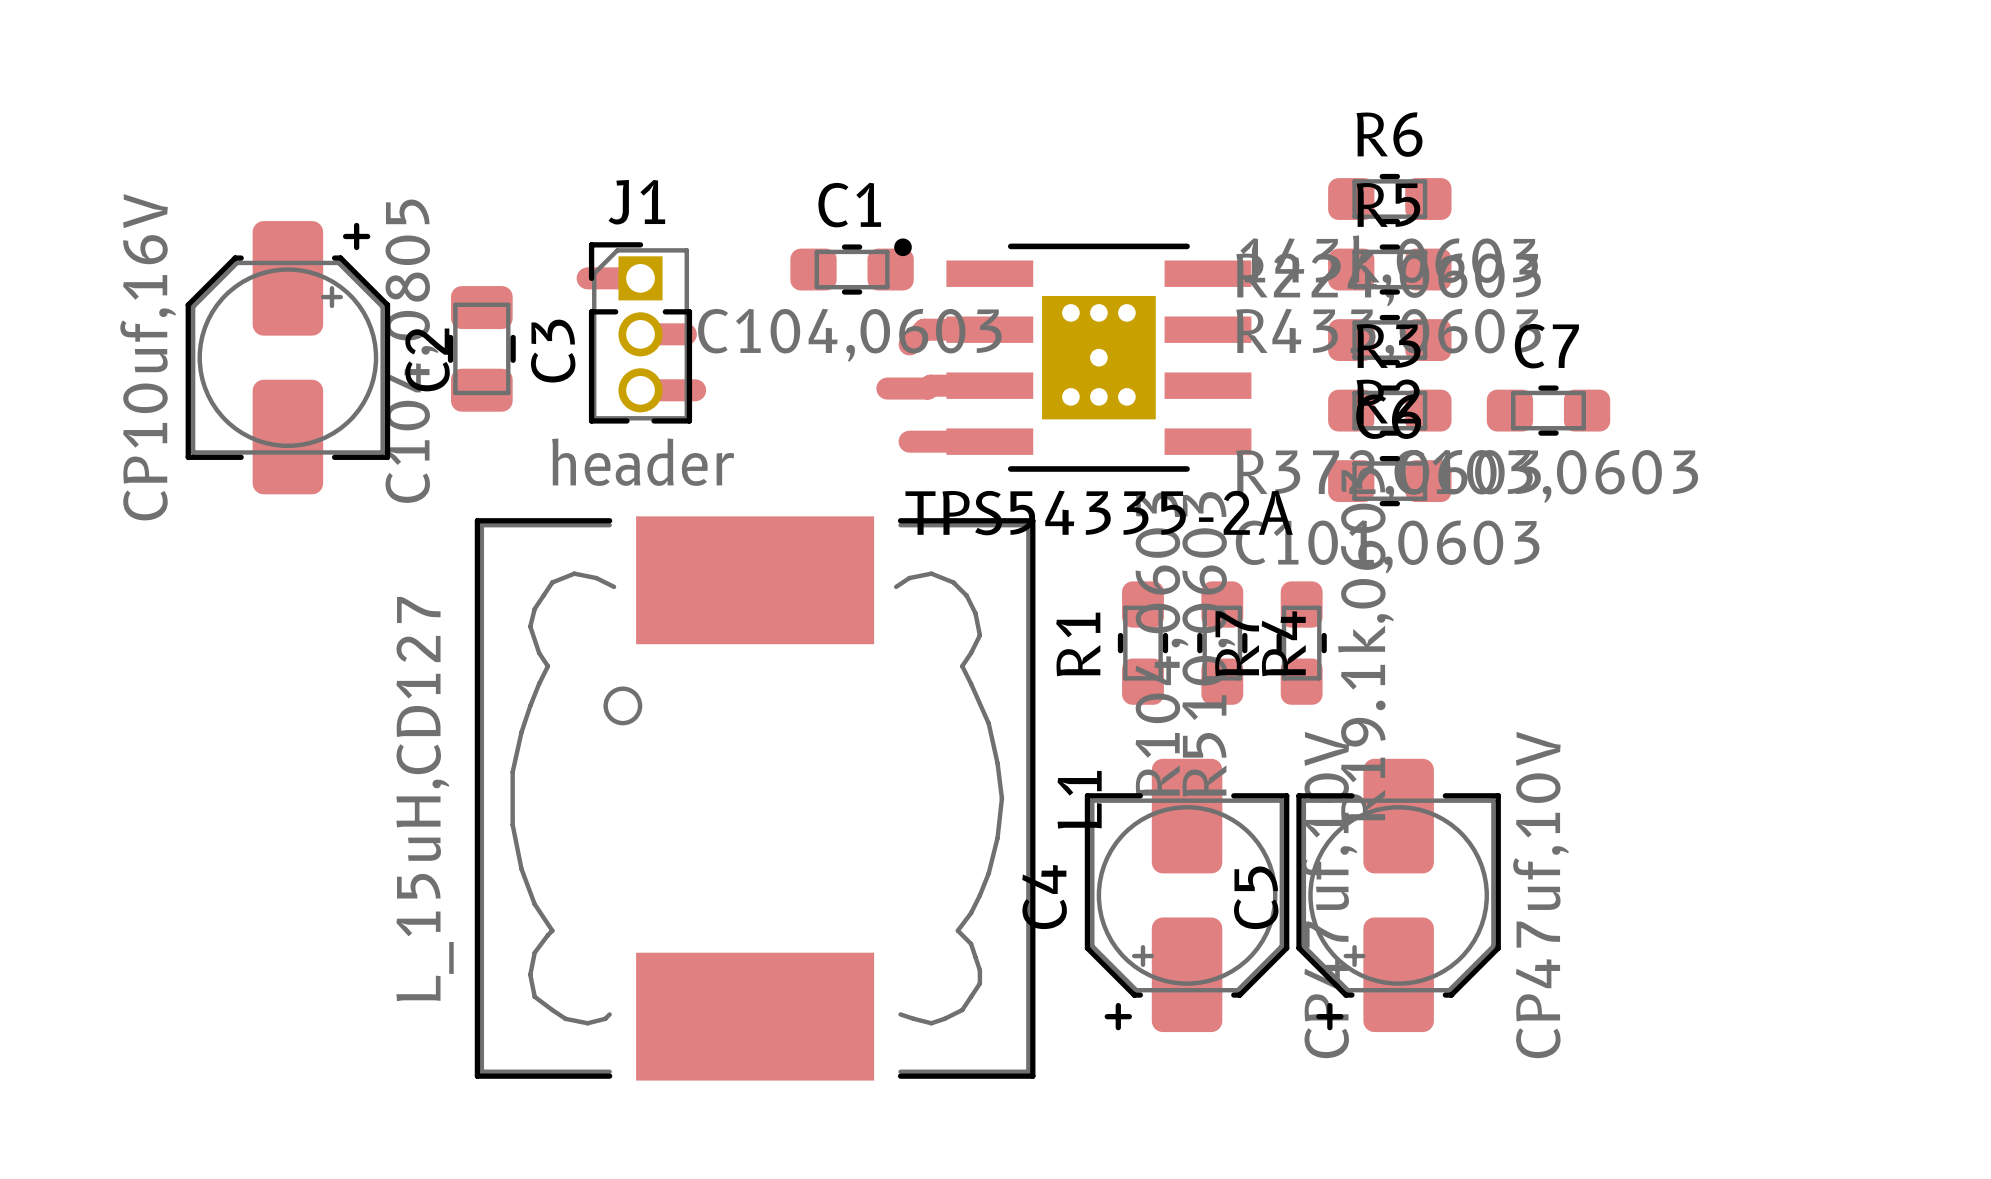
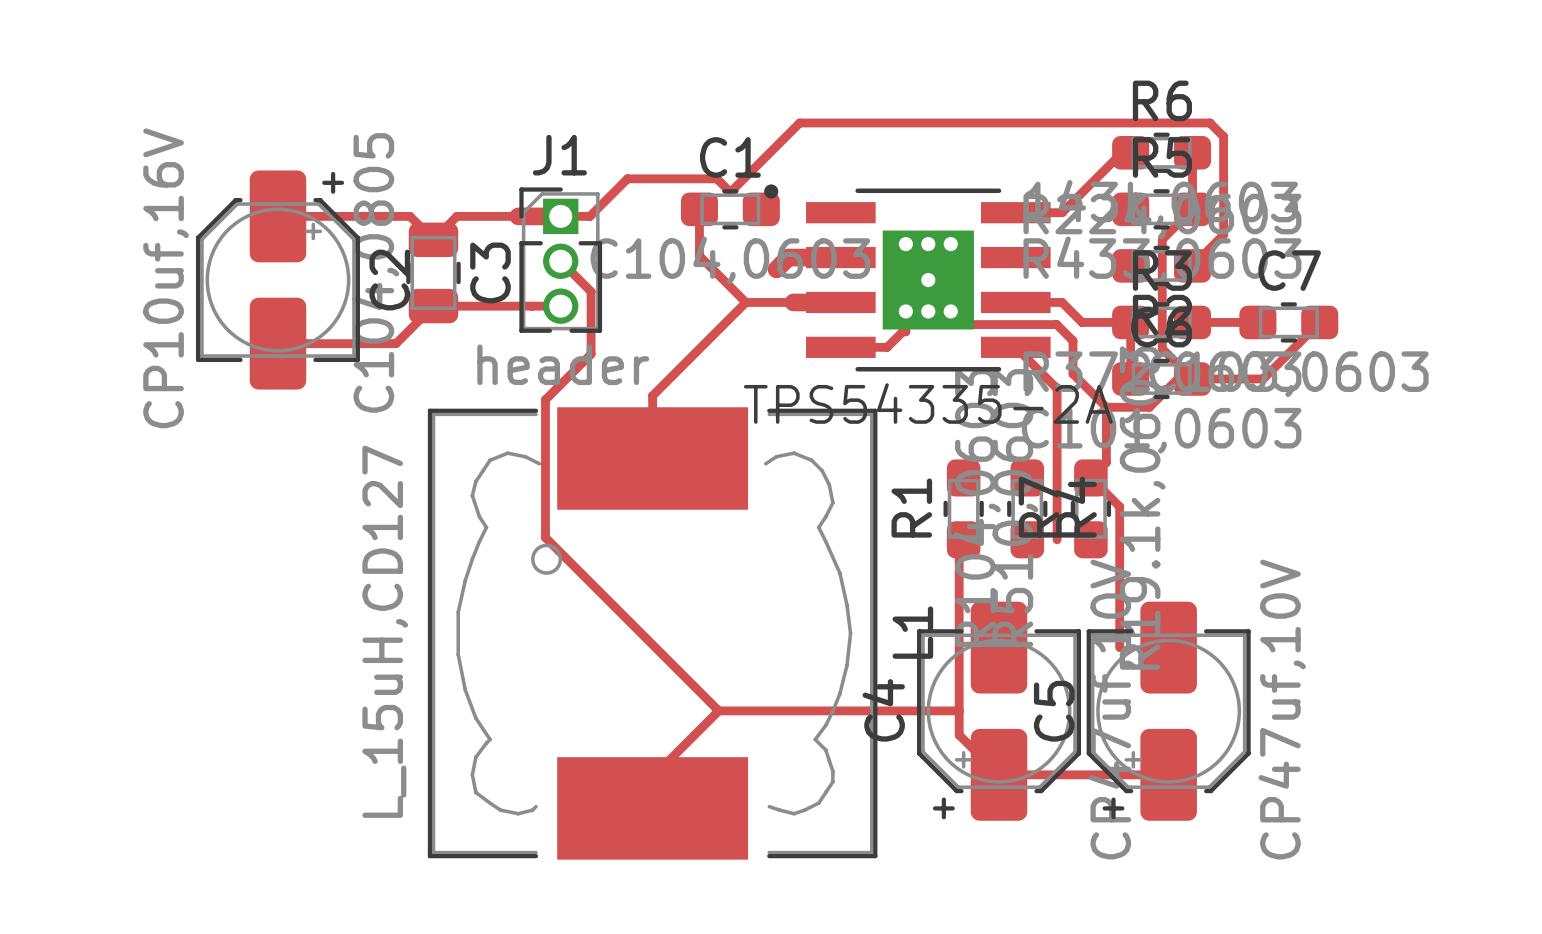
track: none -> (1130, 152) (1122, 152) (1062, 212) (1015, 212)
track: none -> (1192, 152) (1192, 209) (1162, 239) (1162, 348) (1185, 371)
track: none -> (699, 209) (699, 255) (745, 302)
track: none -> (277, 216) (410, 216) (433, 239) (456, 216) (518, 216)
track: none -> (560, 216) (589, 216) (627, 178) (716, 178) (730, 192) (799, 122) (1209, 122) (1223, 136) (1223, 234) (1192, 265)
track: (640, 334) (685, 334) -> (560, 261) (591, 291) (591, 354) (545, 399) (545, 537) (718, 710)
track: none -> (745, 302) (652, 395) (652, 458)
track: (930, 385) (927, 388) (887, 388) -> (793, 302) (745, 302)
track: none -> (1015, 302) (1062, 302) (1082, 322) (1130, 322) (1130, 378)
track: (640, 390) (695, 390) -> (560, 306) (433, 306) (396, 343) (277, 343)
track: none -> (1192, 322) (1257, 322)
track: none -> (1319, 322) (1263, 378) (1192, 378) (1185, 371)
track: (909, 441) (989, 441) -> (1106, 407) (1073, 373) (1073, 340) (1056, 324) (963, 324) (950, 311) (905, 311) (905, 331) (902, 331) (887, 347) (840, 347)
track: none -> (1015, 347) (1057, 388) (1057, 539)
track: none -> (1185, 371) (1149, 407) (1106, 407)
track: none -> (1106, 407) (1106, 462) (1090, 477) (1119, 506) (1119, 647)
track: none -> (963, 539) (959, 544) (959, 735) (999, 774) (1168, 774)
track: none -> (718, 710) (959, 710)
track: none -> (718, 710) (652, 777) (652, 808)

